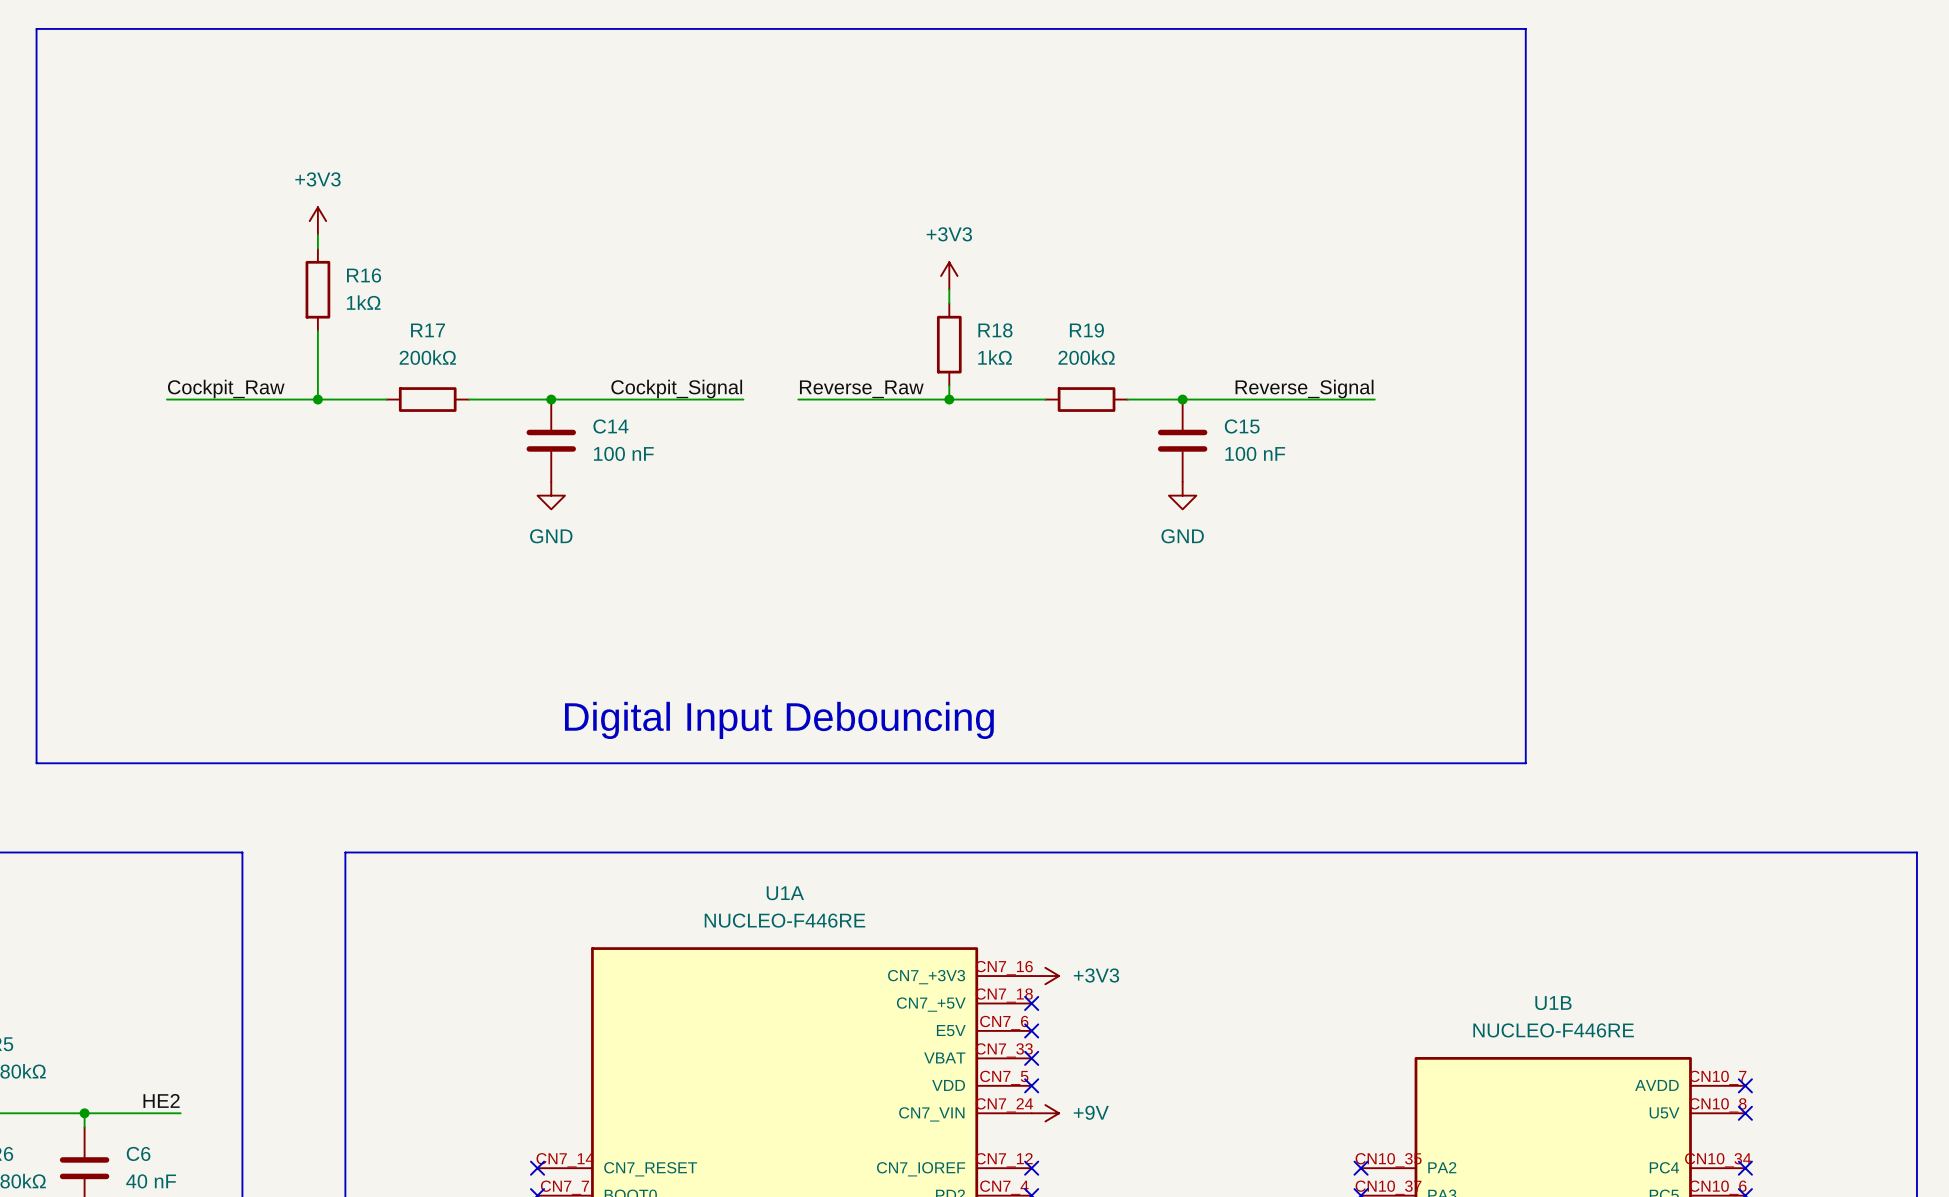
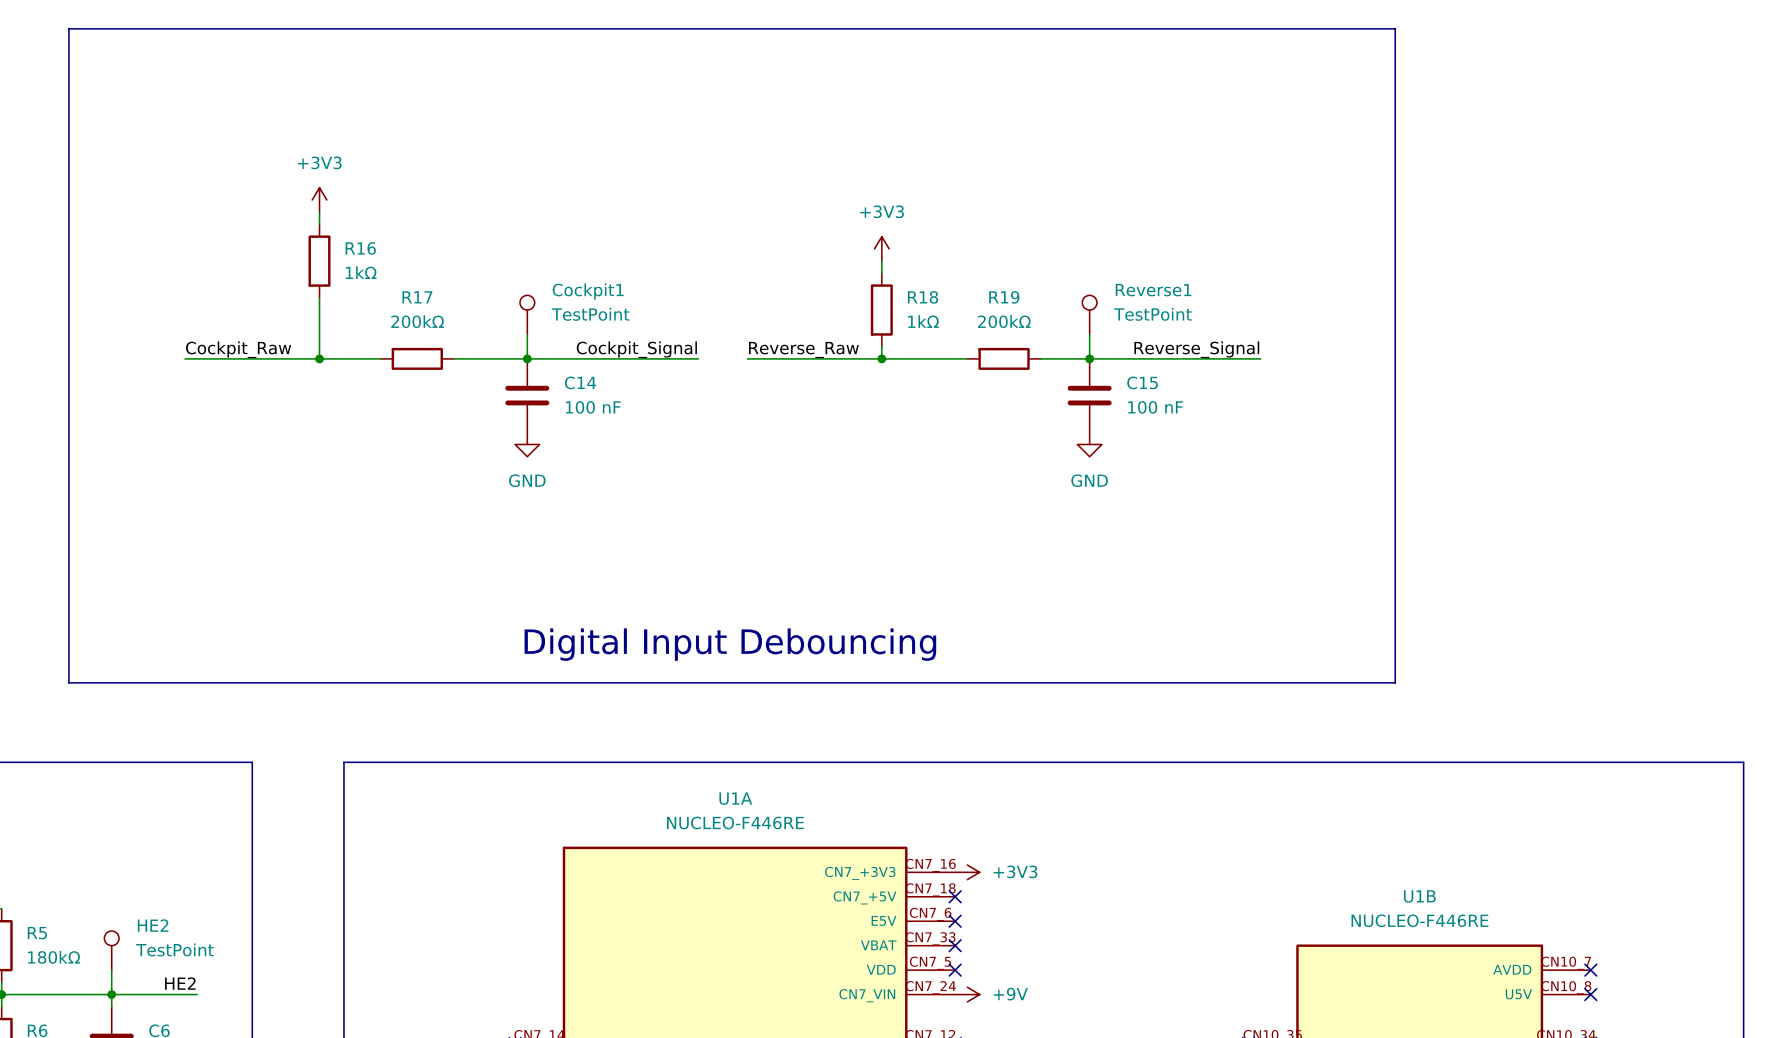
Cockpit1: none -> TestPoint (527, 314)
Reverse1: none -> TestPoint (1089, 314)
wire: none -> (527, 334) (527, 358)
wire: none -> (1089, 334) (1089, 358)
HE2: none -> TestPoint (111, 950)
wire: none -> (111, 970) (111, 994)

